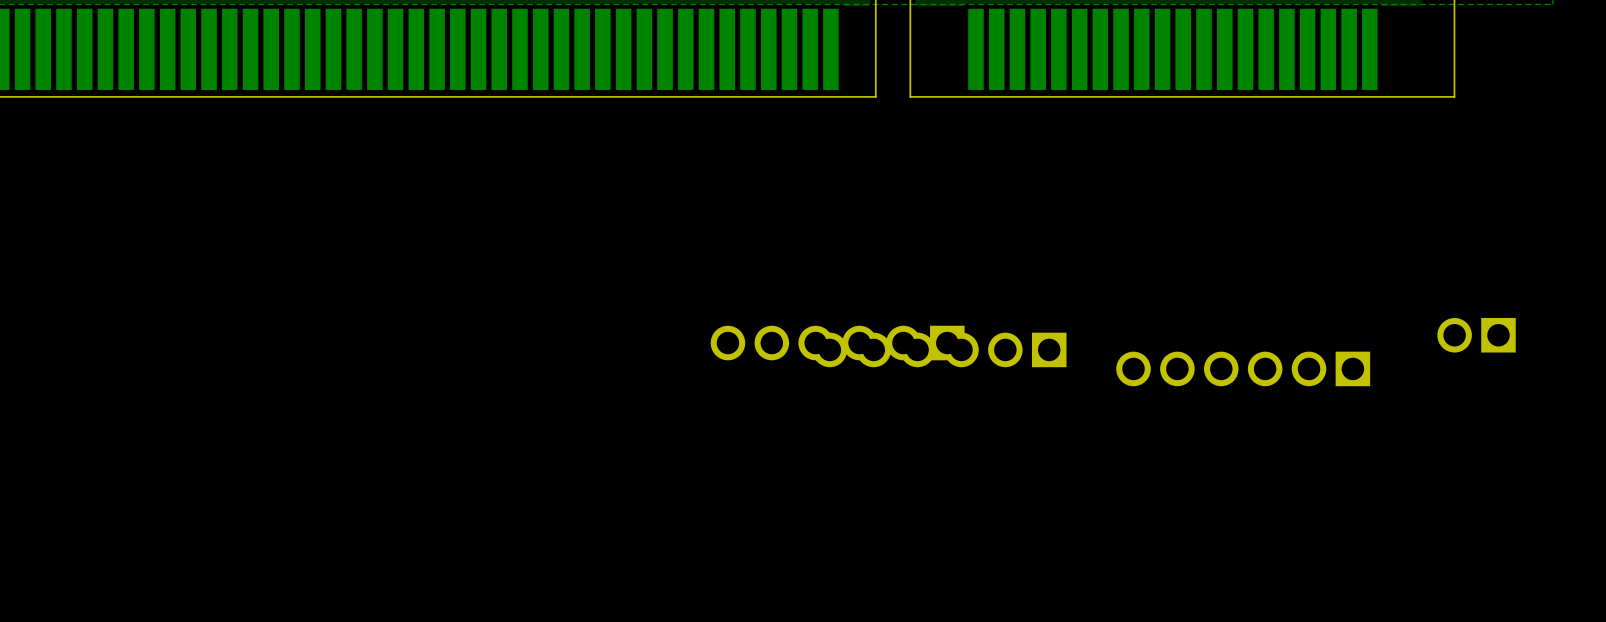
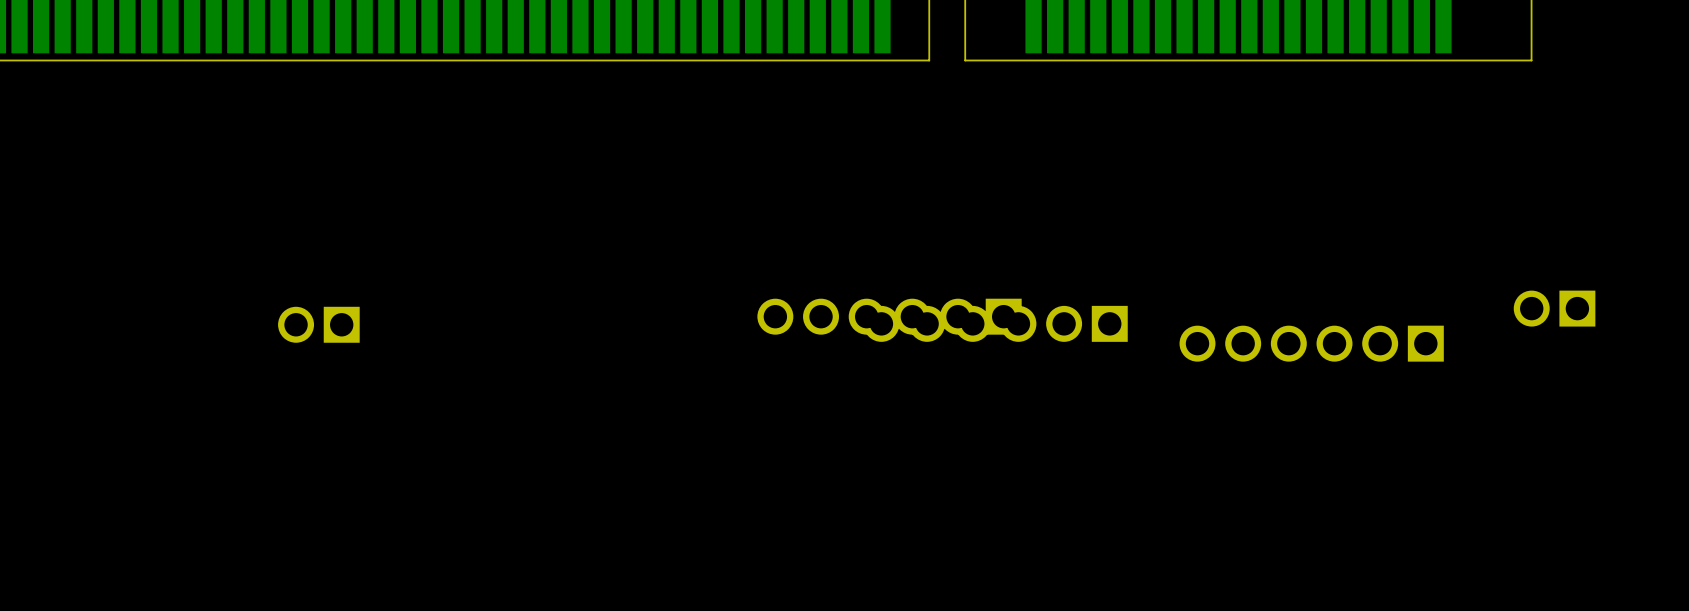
part: none -> (318, 324)

